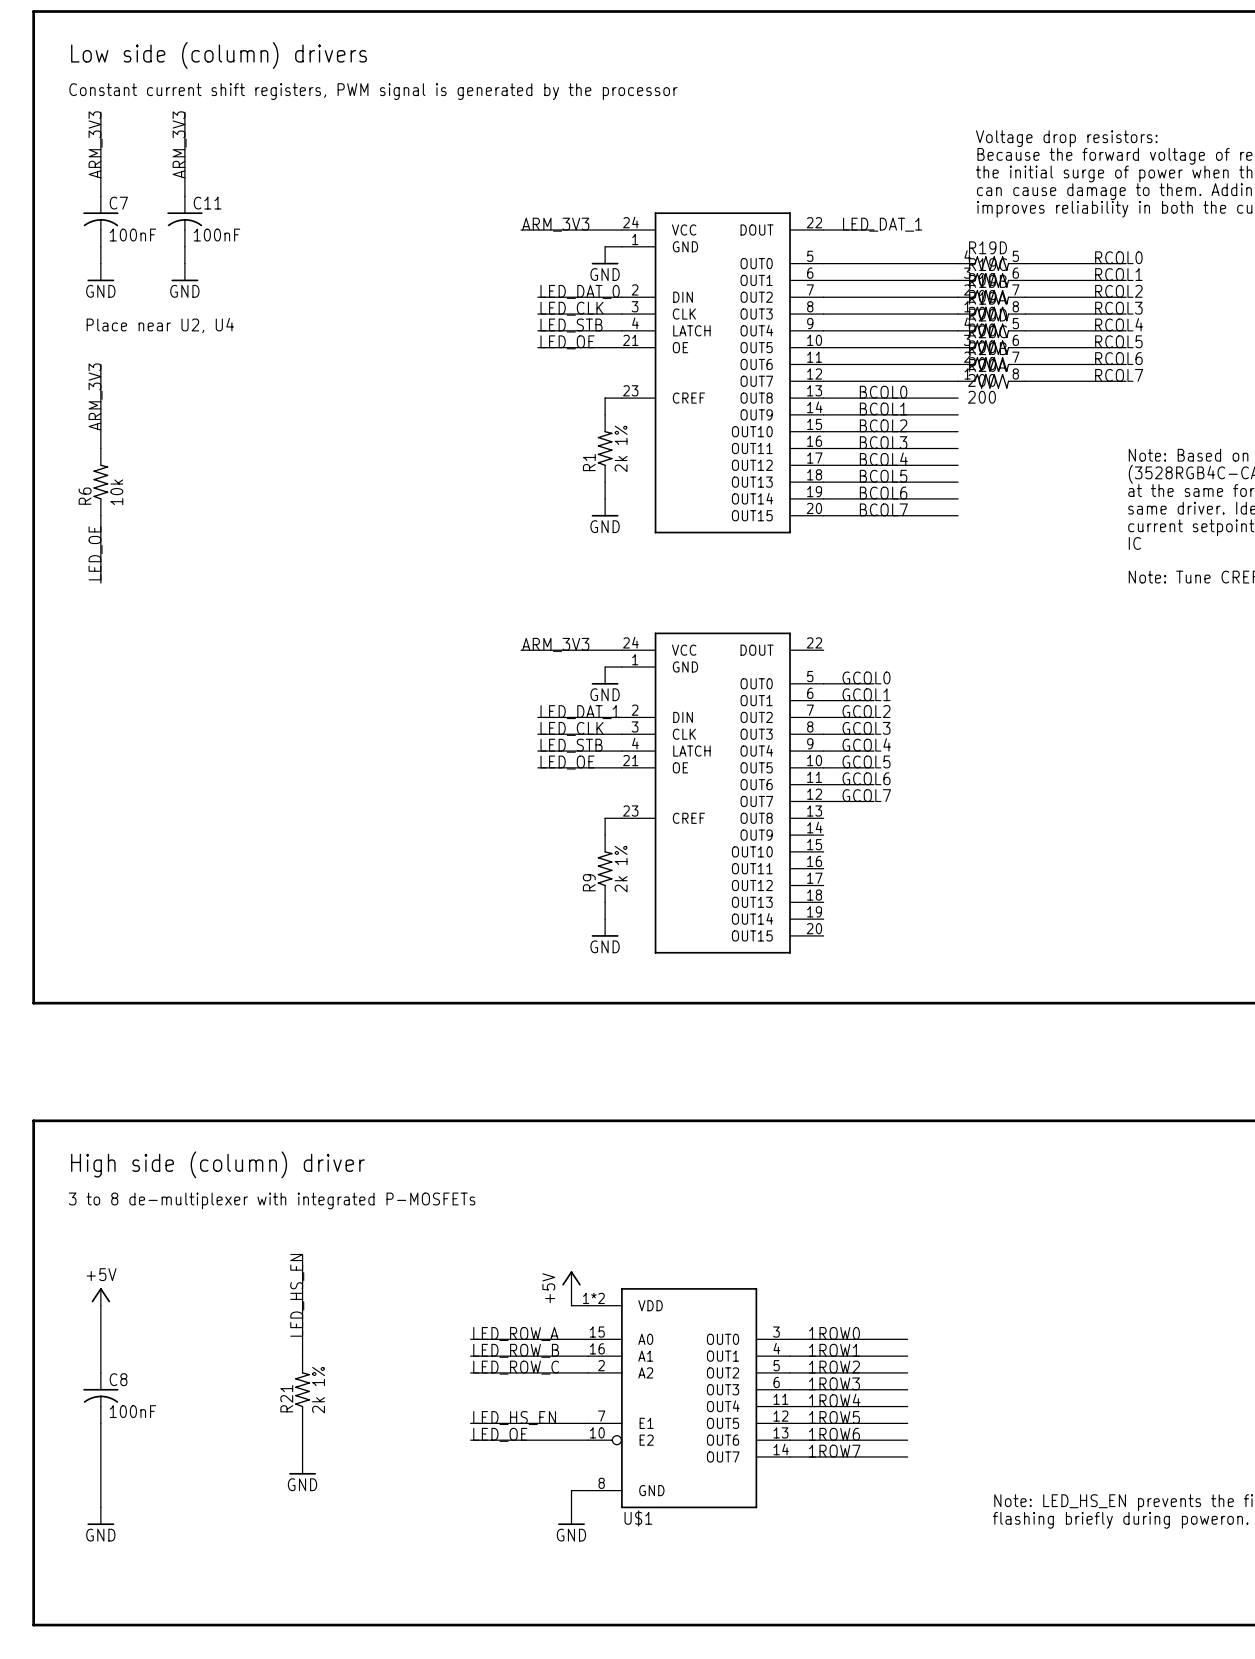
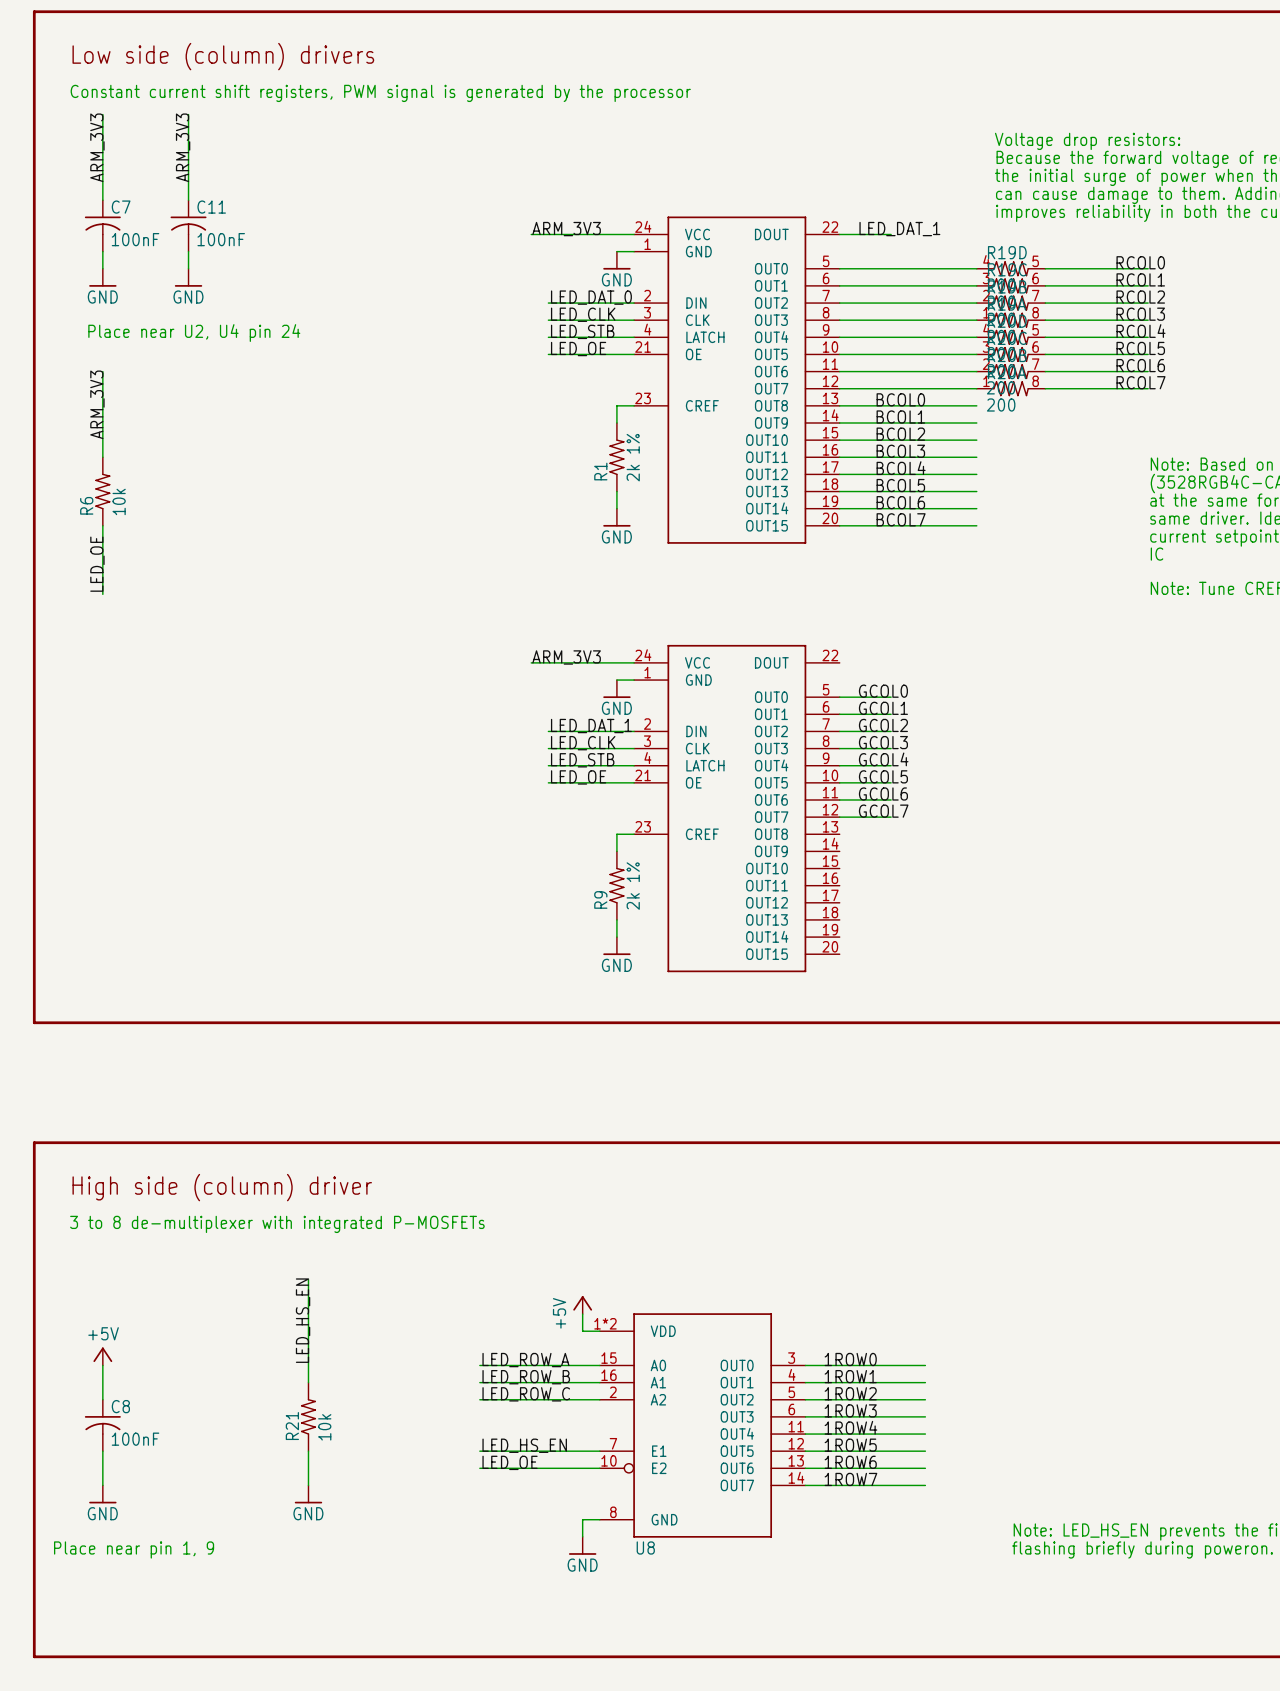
text: Place near U2, U4 (160, 325) -> Place near U2, U4 pin 24 (194, 333)
power symbol position: +5V (100, 1296) -> +5V (102, 1356)
R21 value: 2k 1% (318, 1390) -> 10k (324, 1427)
wire: (100, 1456) (100, 1507) -> none
power symbol position: GND (100, 1516) -> GND (102, 1494)
U$1 name: U$1 (638, 1518) -> U8 (645, 1547)
text: none -> Place near pin 1, 9 (134, 1549)

